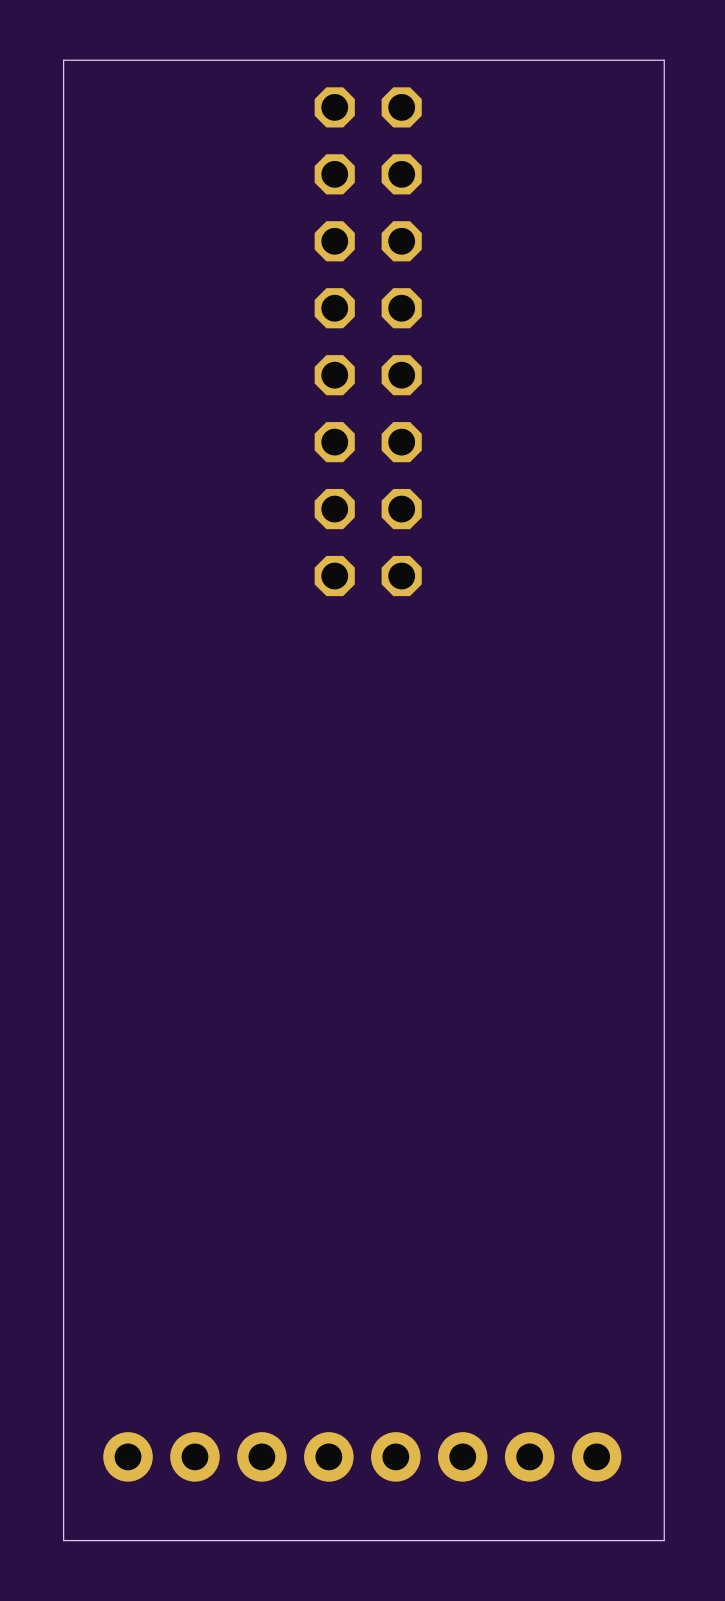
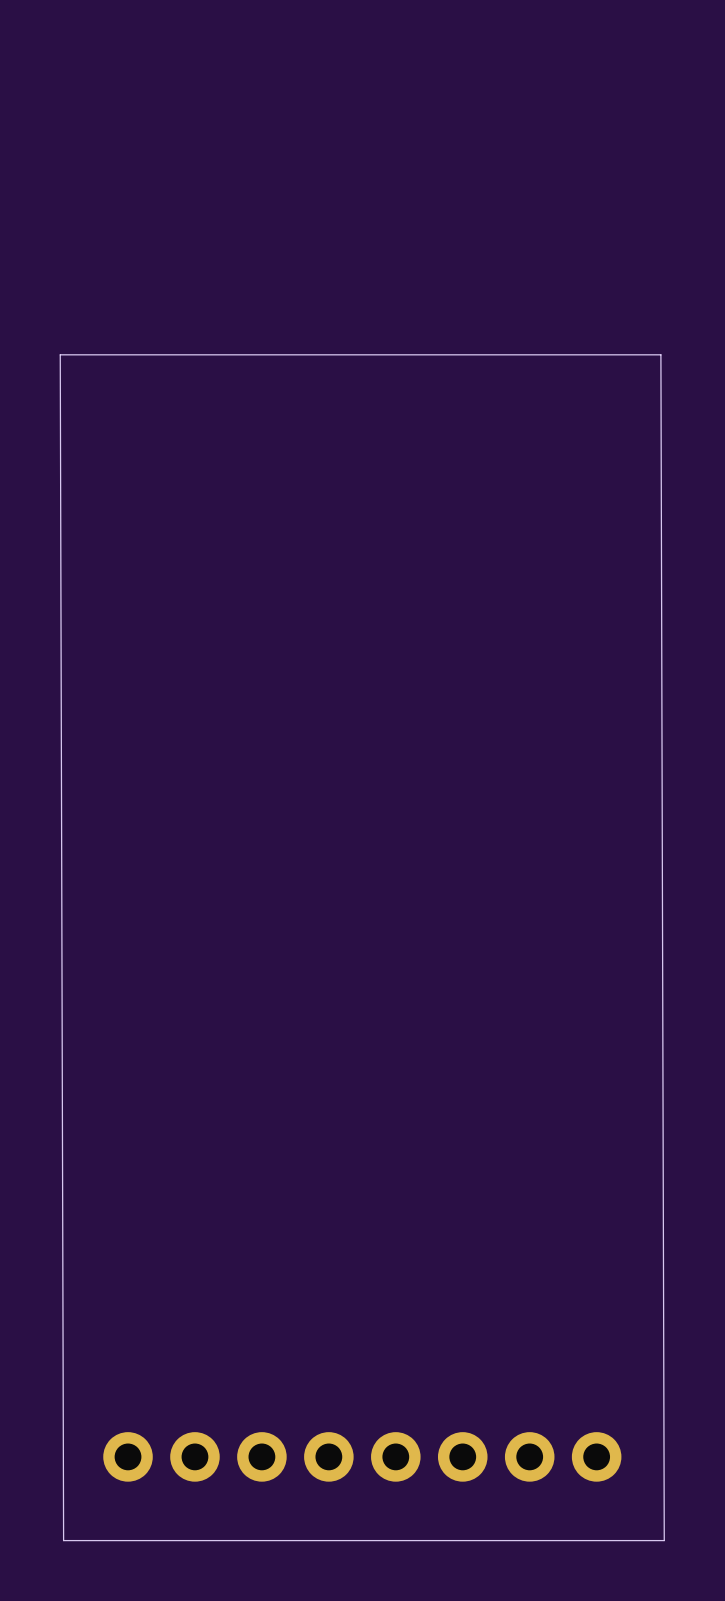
part: (368, 341) -> none
board edge: (664, 1540) (664, 60) (63, 60) (63, 1540) -> (664, 1540) (660, 354) (60, 354) (63, 1540)

